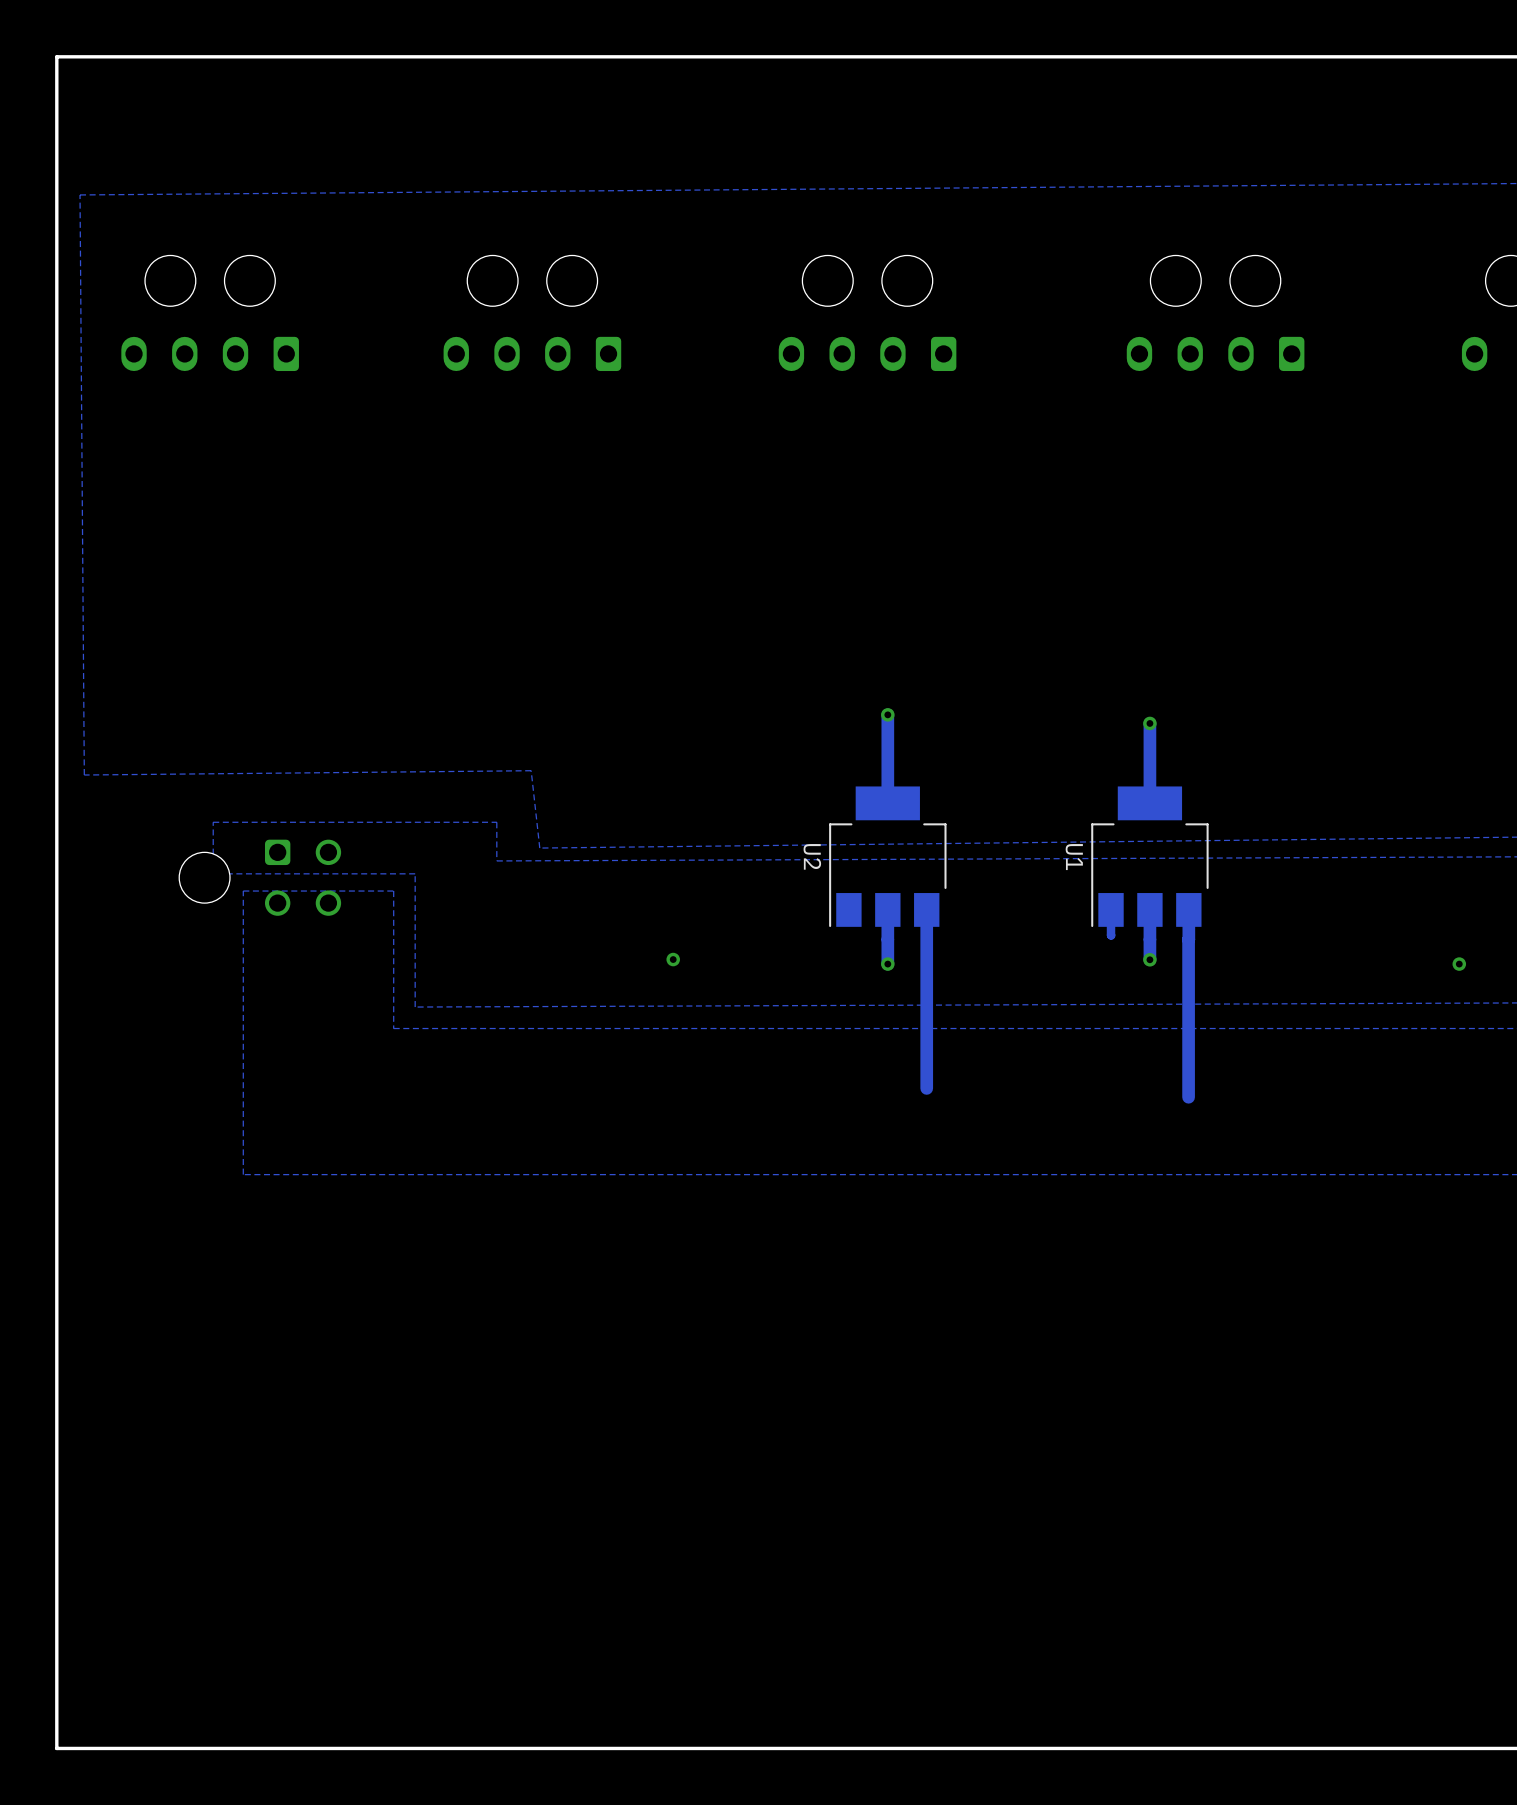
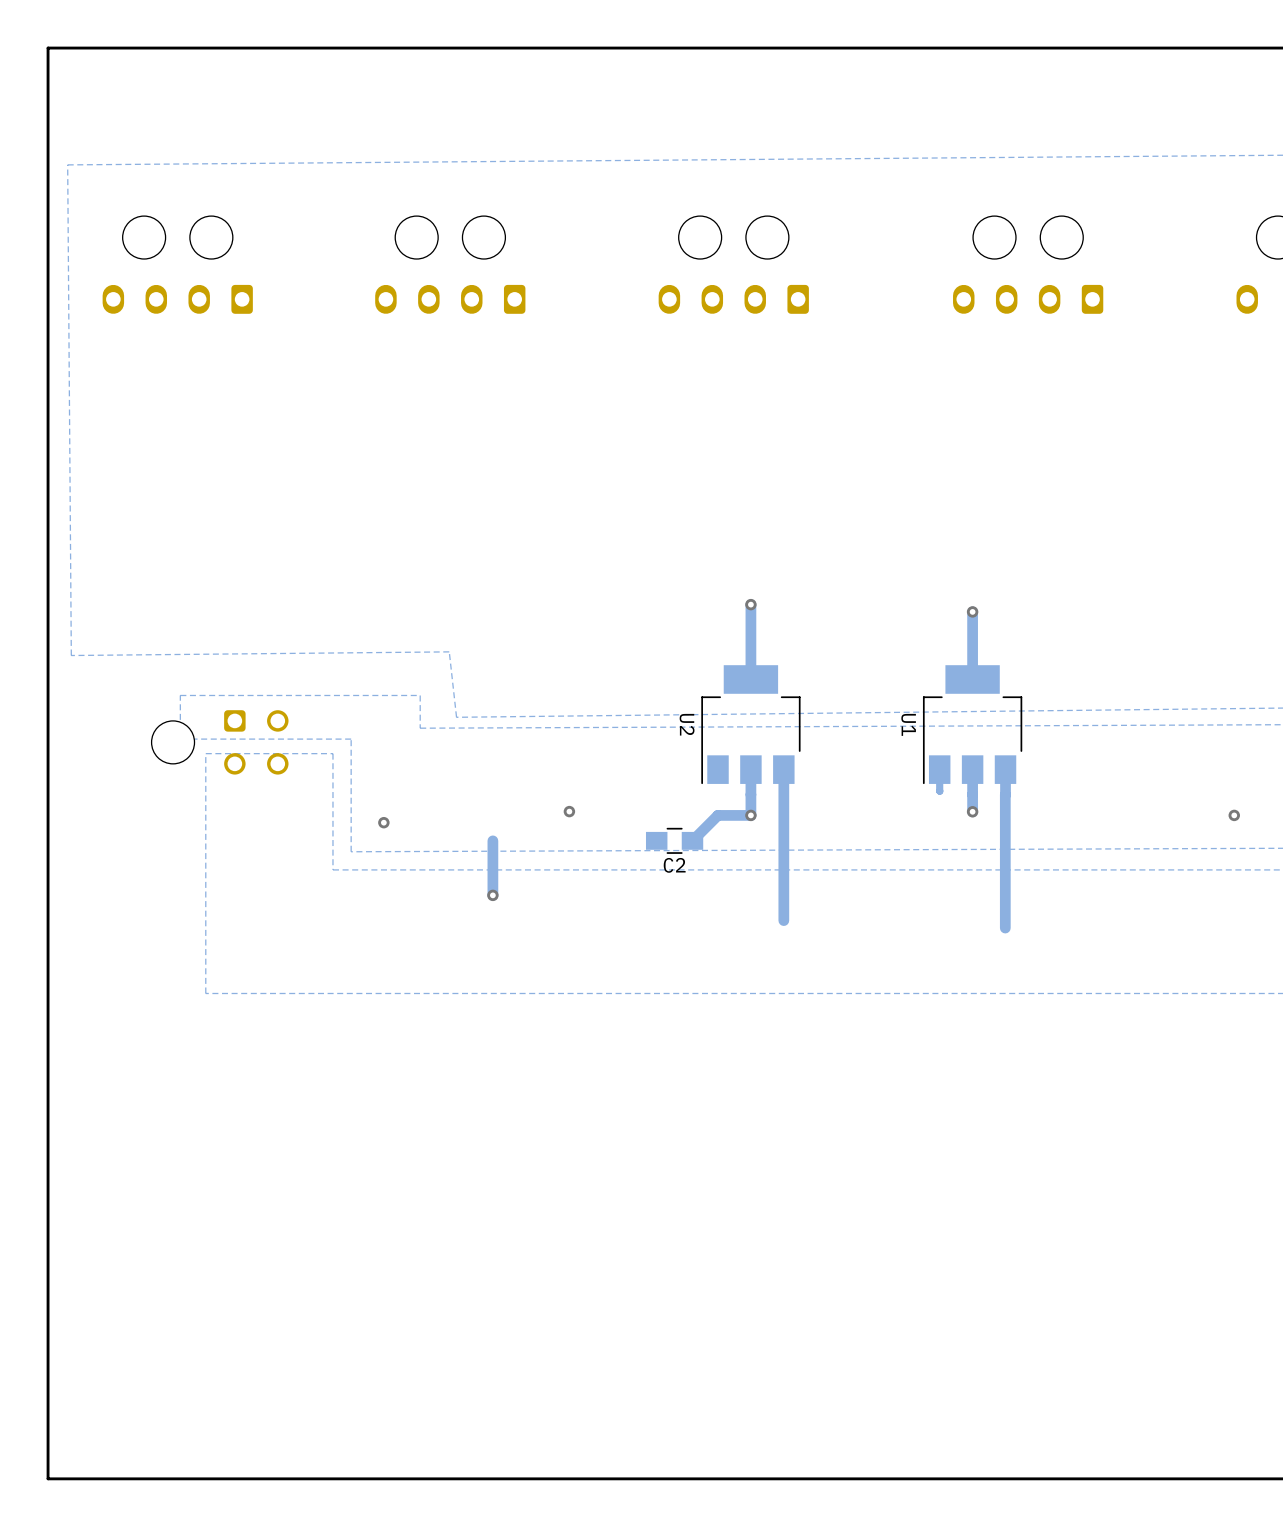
track: none -> (750, 815) (717, 815) (692, 840)
via: none -> (383, 822)
track: none -> (492, 840) (492, 895)
C2: none -> (674, 840)
via: none -> (492, 895)

